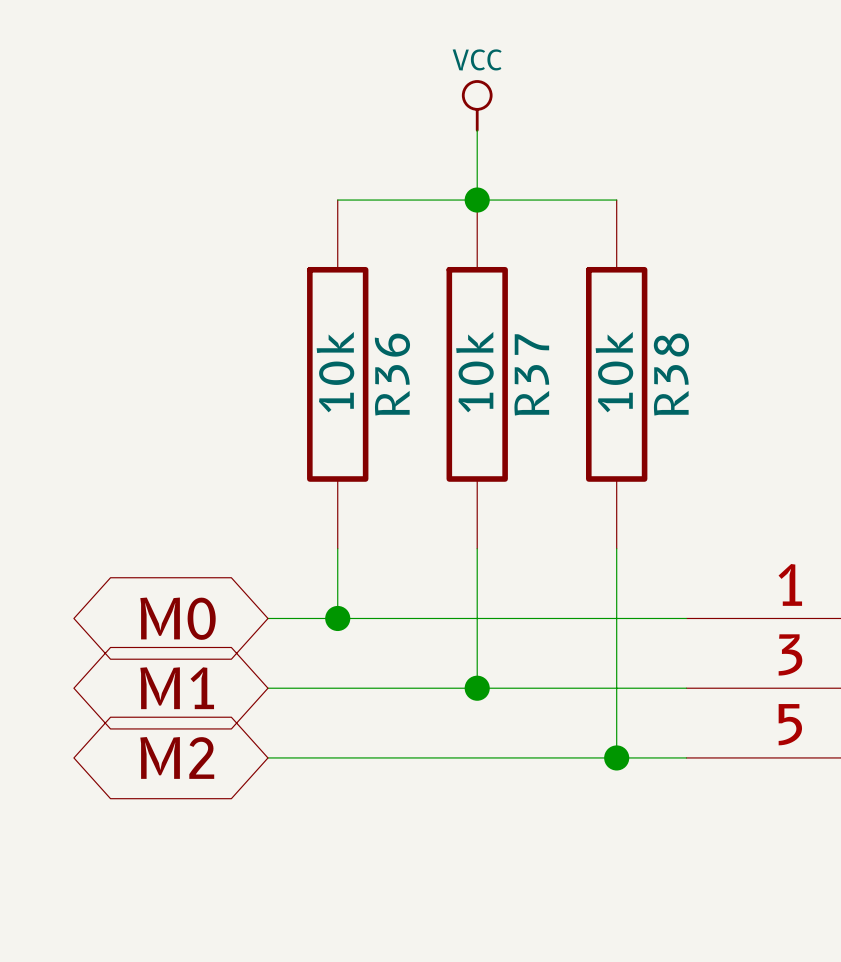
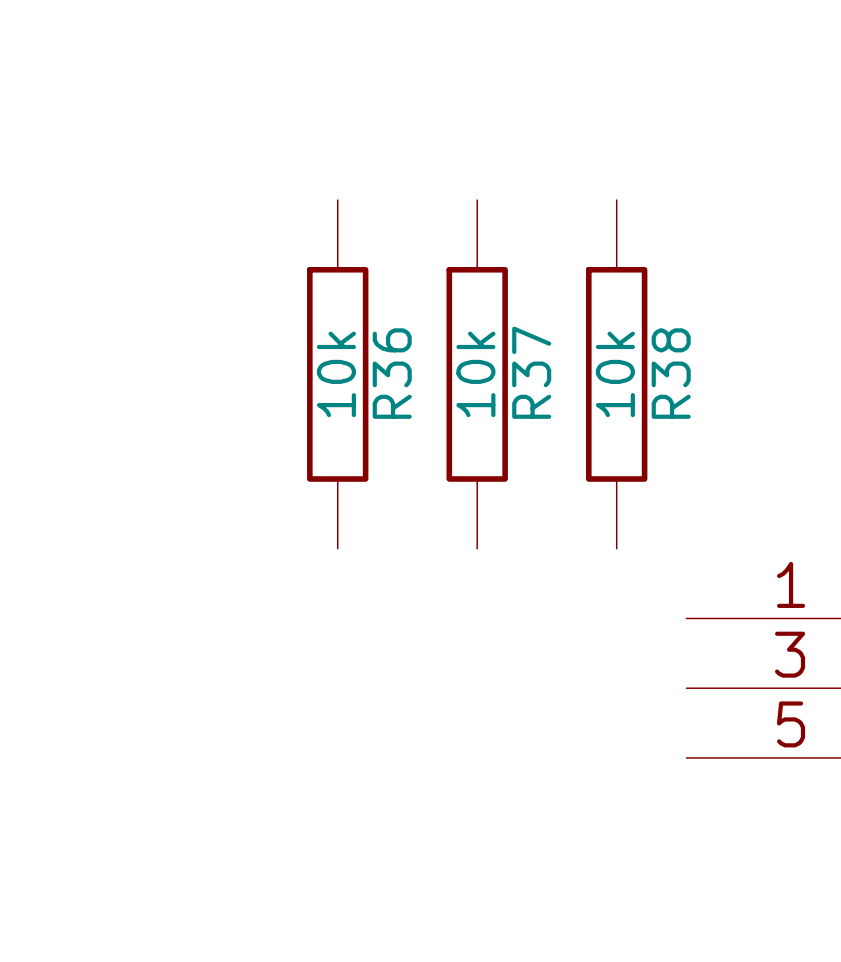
power symbol: VCC (477, 105) -> none
wire: (477, 130) (477, 200) -> none
wire: (337, 200) (616, 200) -> none
junction: (477, 200) -> none
wire: (337, 548) (337, 618) -> none
wire: (477, 548) (477, 688) -> none
wire: (616, 548) (616, 757) -> none
global label: M0 (178, 618) -> none
wire: (267, 618) (686, 618) -> none
junction: (337, 618) -> none
global label: M1 (177, 688) -> none
wire: (267, 688) (686, 688) -> none
junction: (477, 688) -> none
global label: M2 (177, 757) -> none
wire: (267, 757) (686, 757) -> none
junction: (616, 757) -> none

